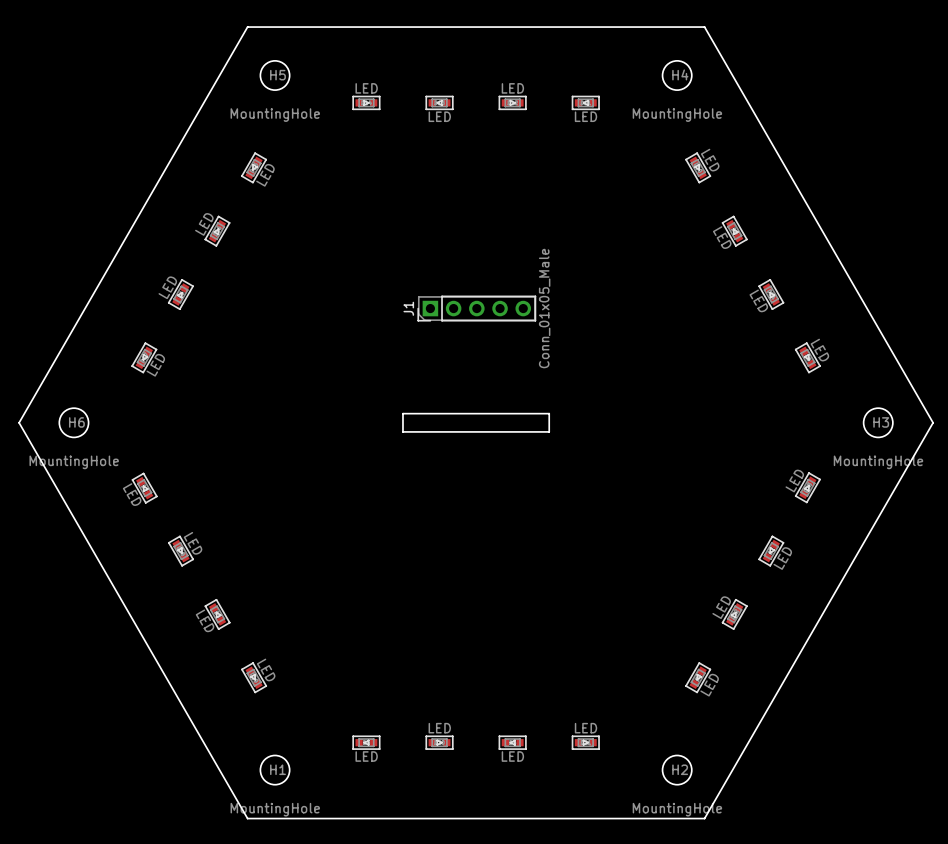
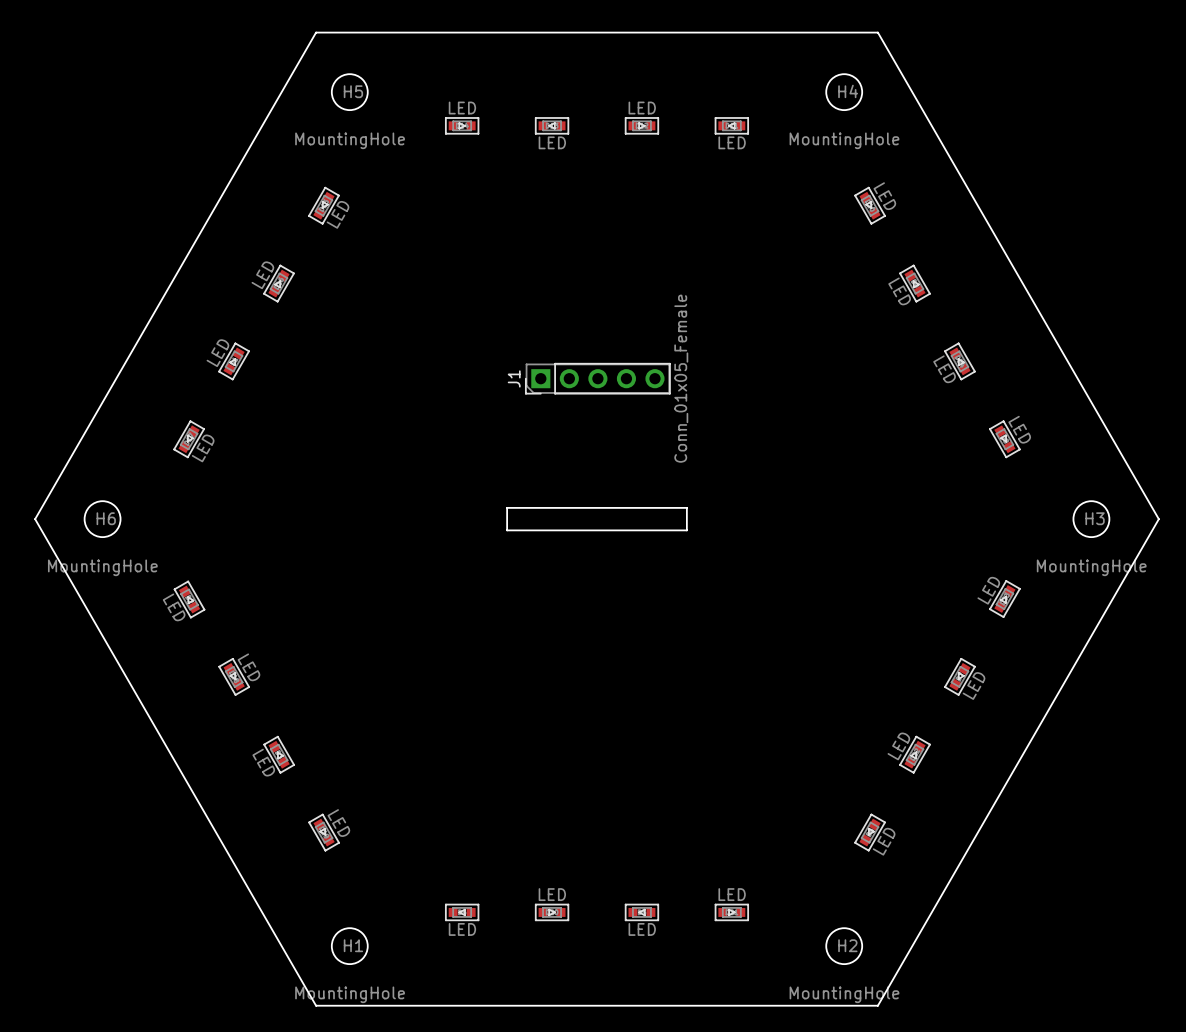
J1 value: Conn_01x05_Male (544, 308) -> Conn_01x05_Female (681, 378)

